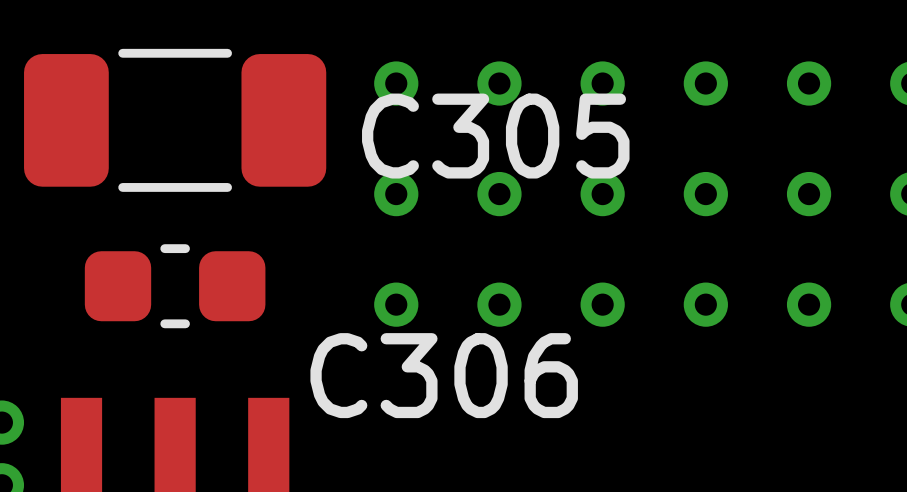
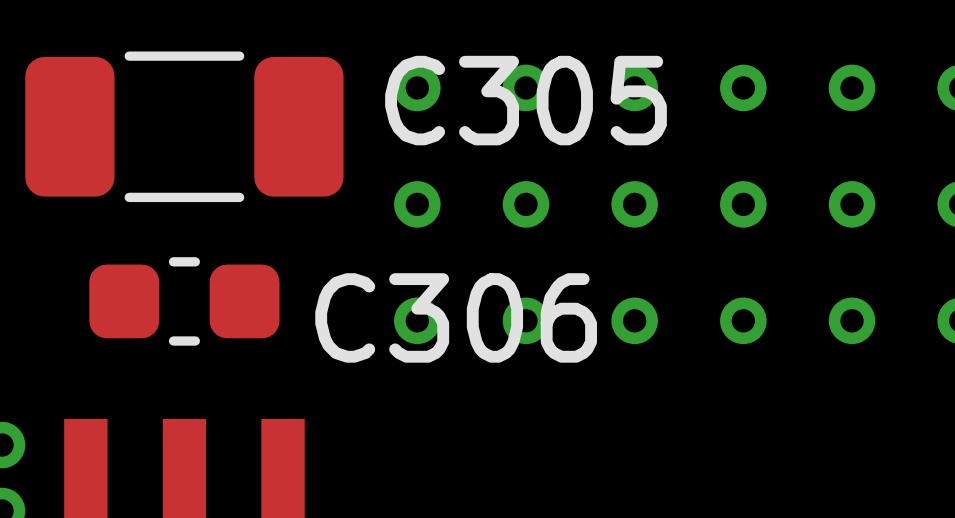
C305 name position: C305 (495, 136) -> C305 (525, 100)
C306 name position: C306 (444, 375) -> C306 (456, 317)

